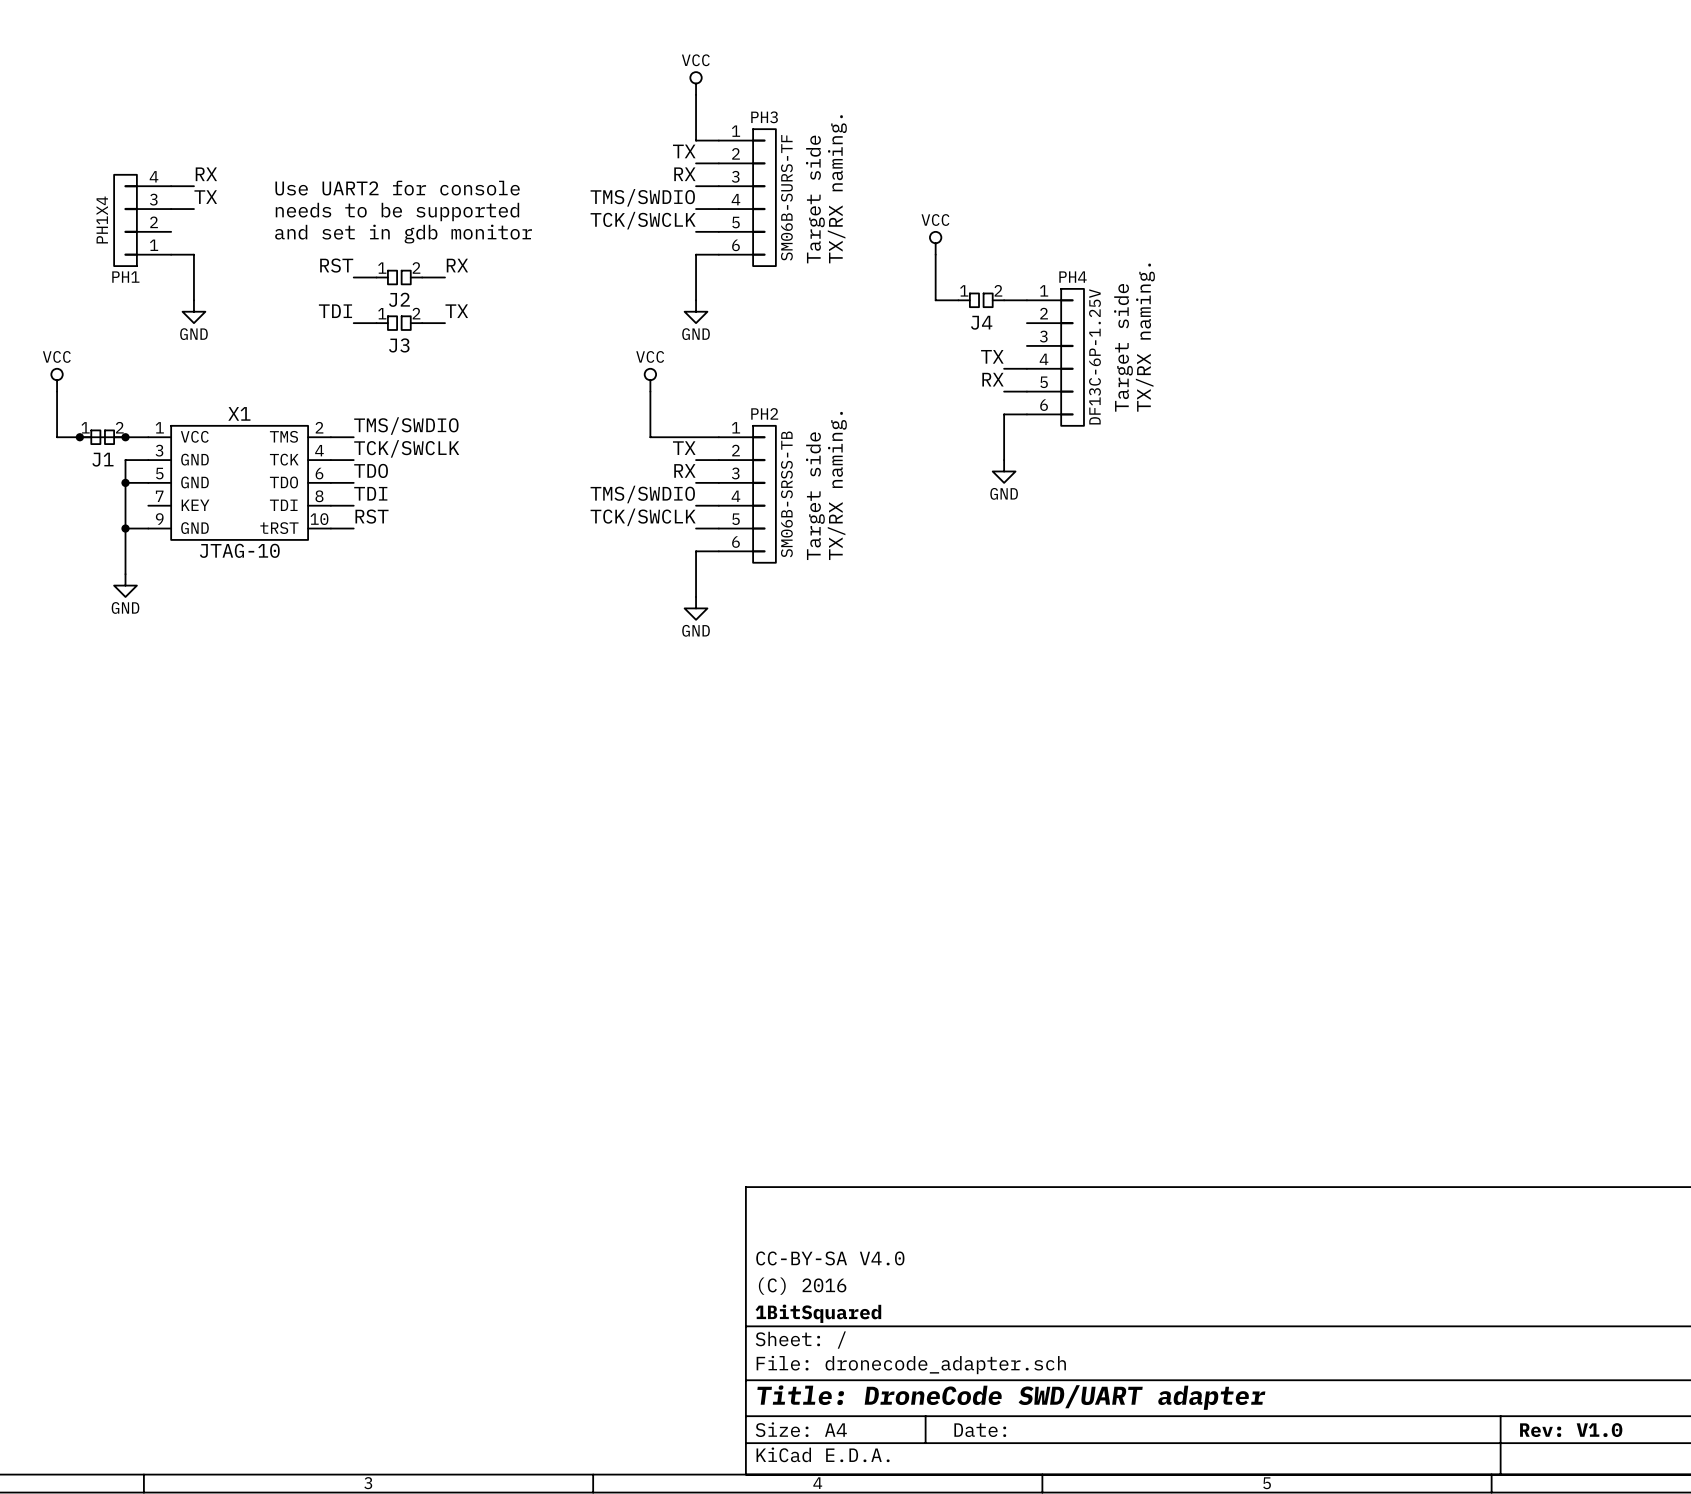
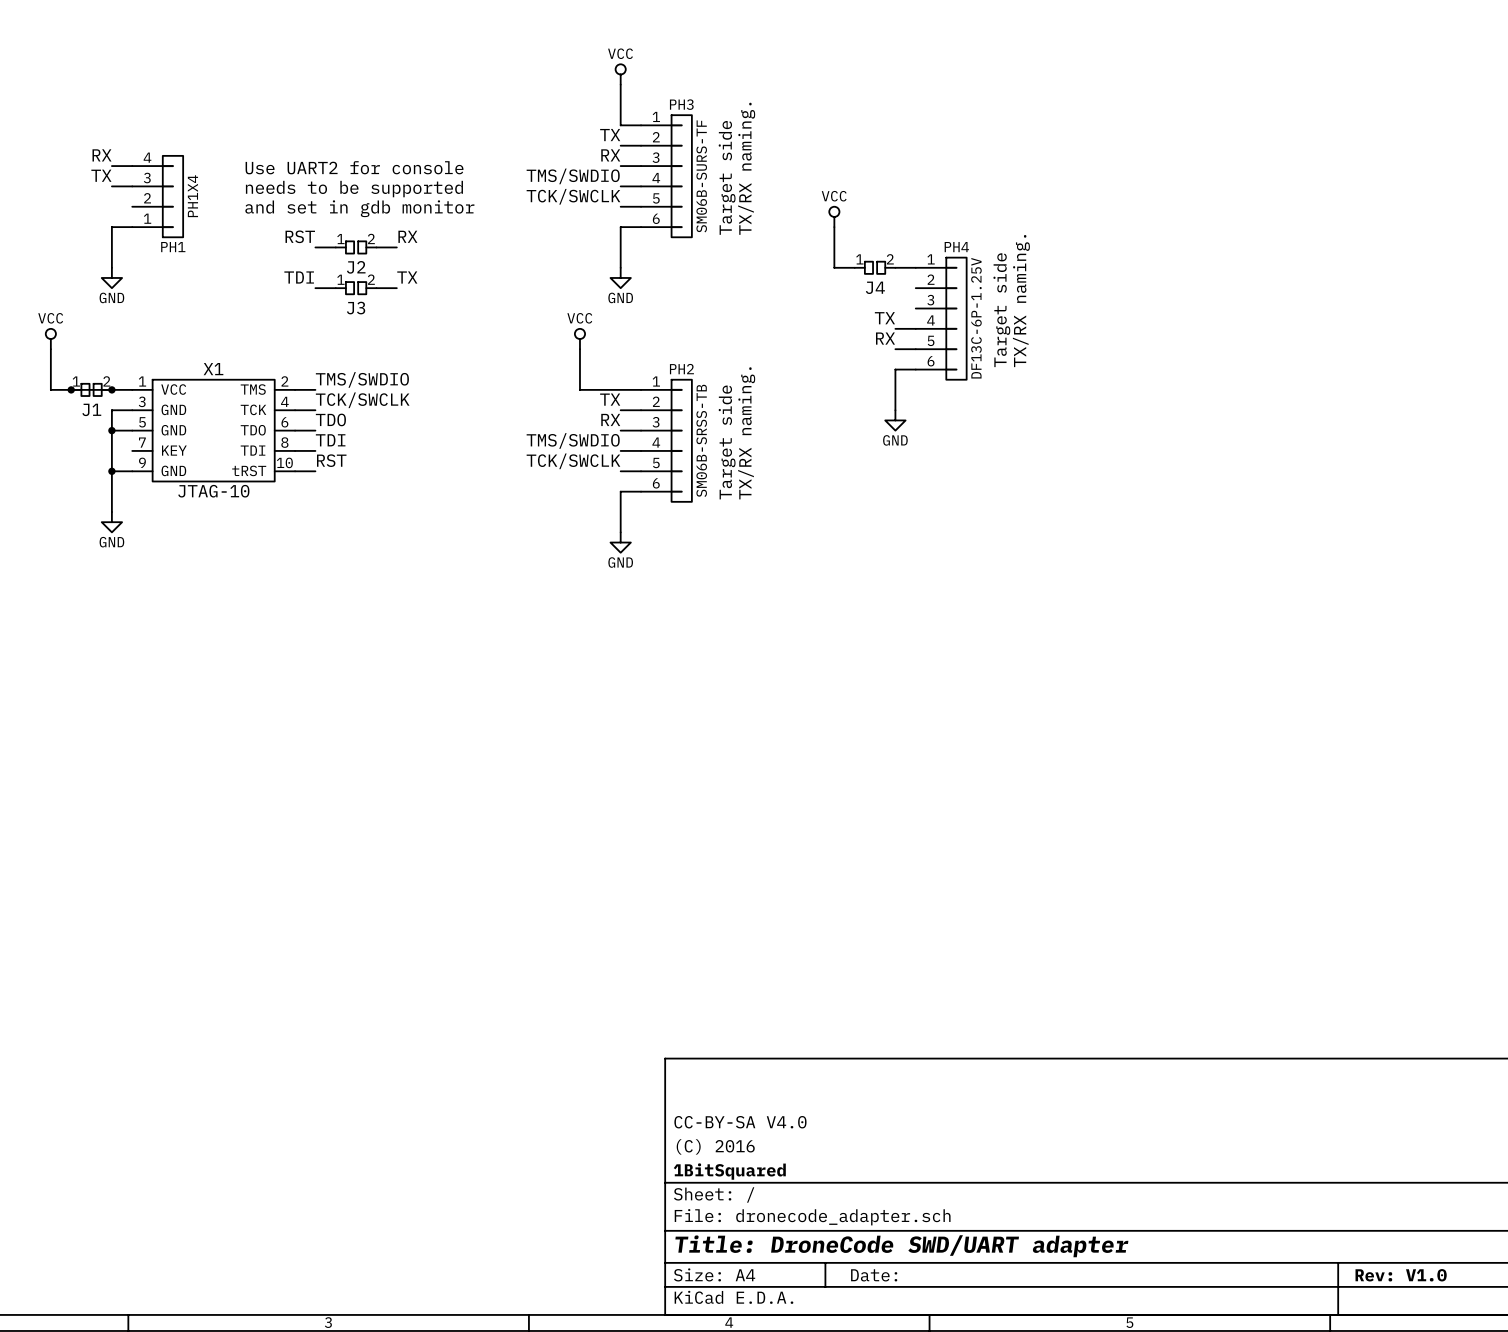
label position: RX (206, 174) -> RX (101, 155)
label position: TX (205, 197) -> TX (101, 175)
PH1 flip: as is (126, 220) -> left-right (172, 196)
wire: none -> (132, 227) (111, 227) (111, 267)
wire: (171, 254) (193, 254) (193, 300) -> none
power symbol position: GND (193, 311) -> GND (111, 277)

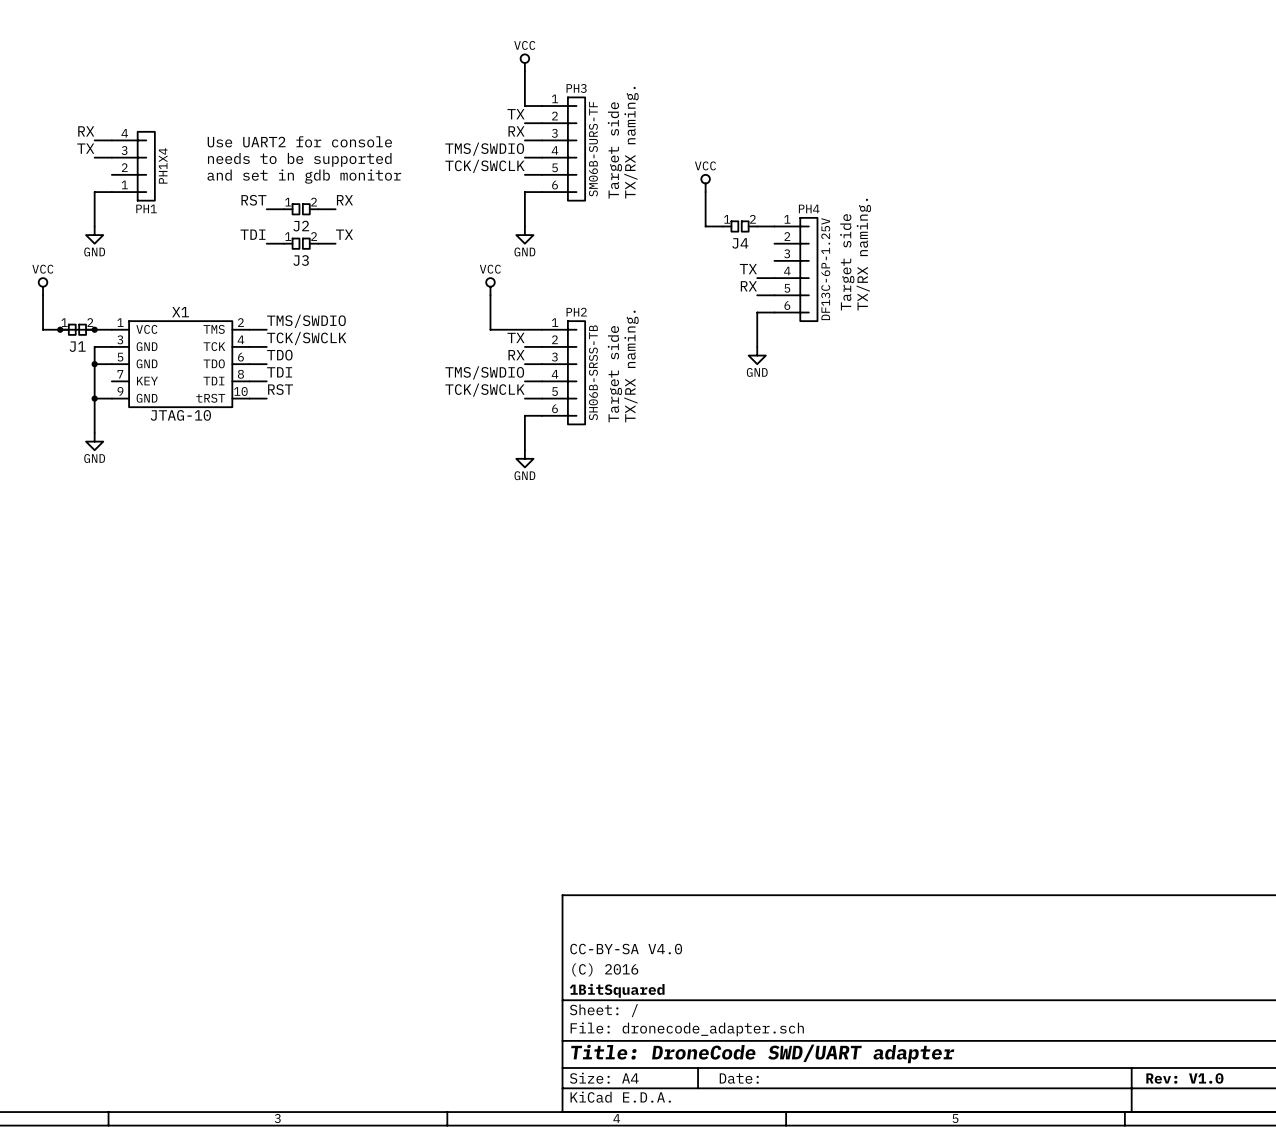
PH2 value: SM06B-SRSS-TB (701, 440) -> SH06B-SRSS-TB (593, 372)

